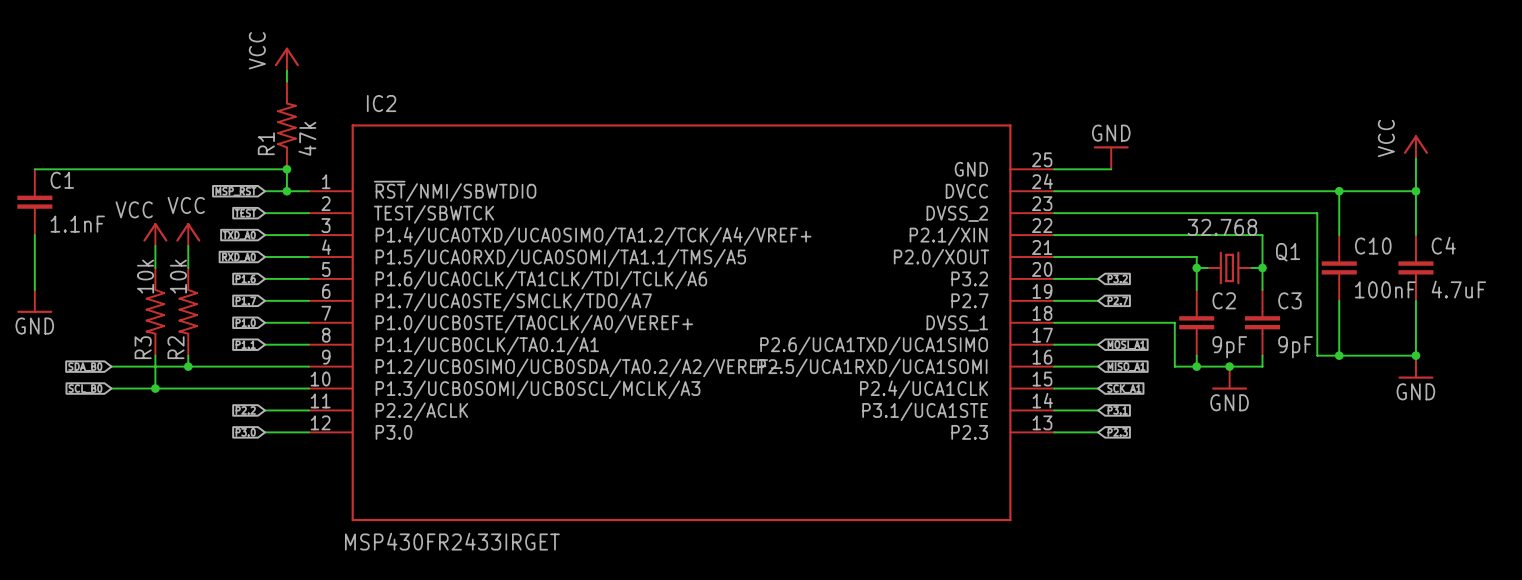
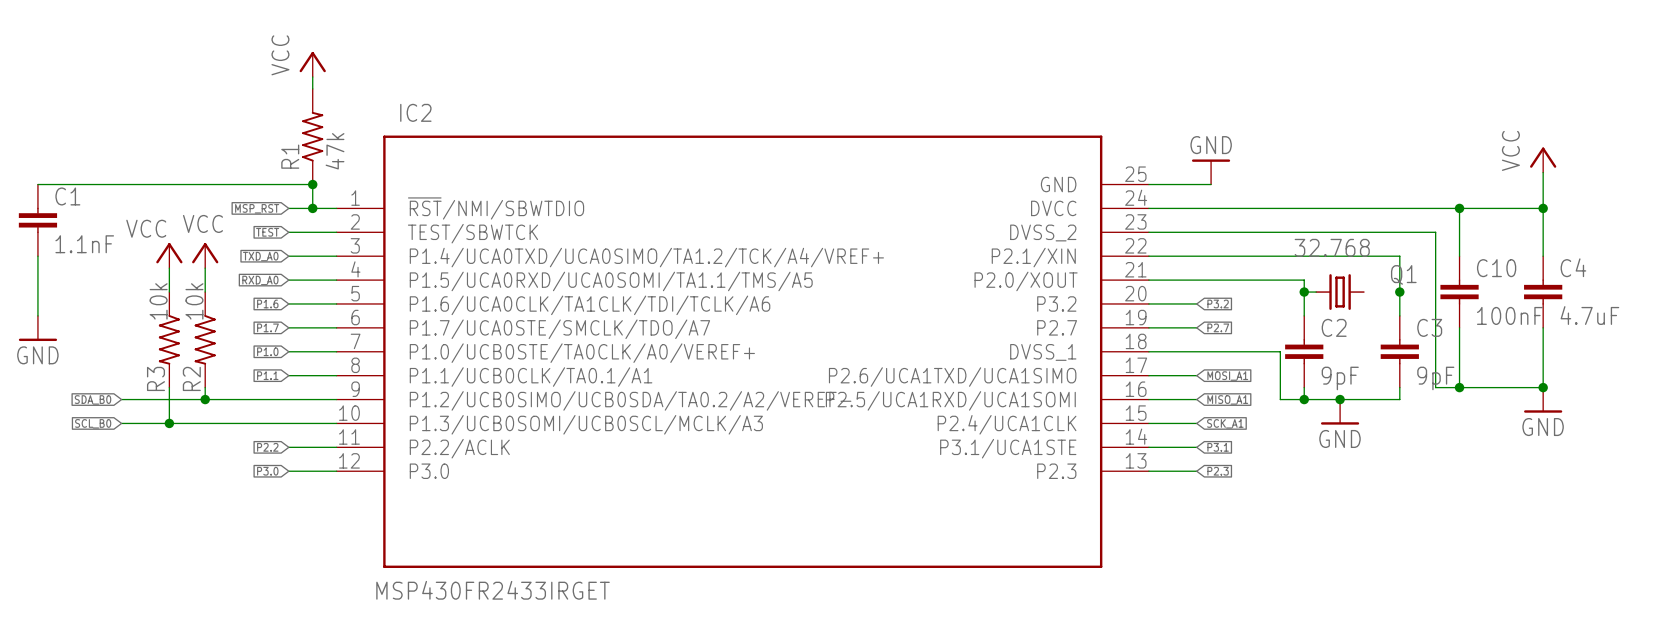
wire: (1262, 235) (1262, 289) -> (1375, 256) (1399, 256) (1399, 315)
wire: (1251, 267) (1262, 267) -> none
junction position: (1262, 267) -> (1399, 292)
C3 position: (1262, 322) -> (1399, 351)
wire: (1262, 355) (1262, 366) -> (1399, 387) (1399, 399) (1375, 399)

